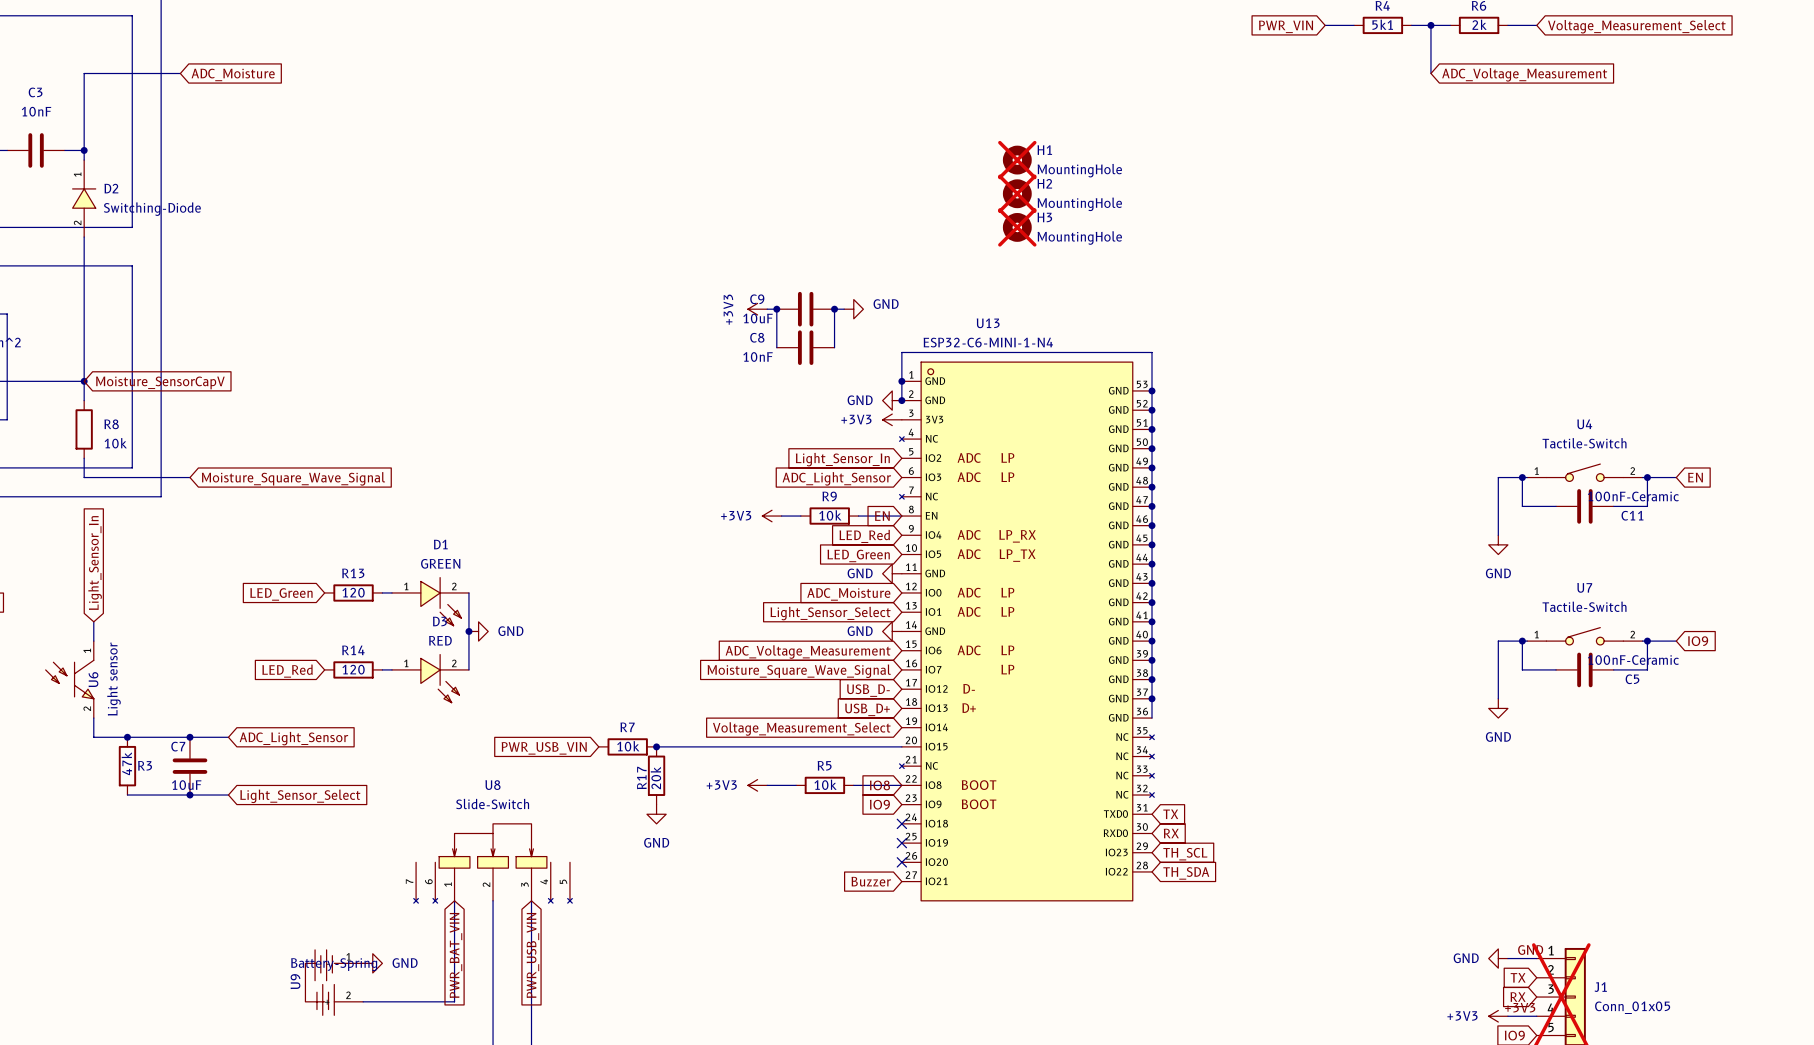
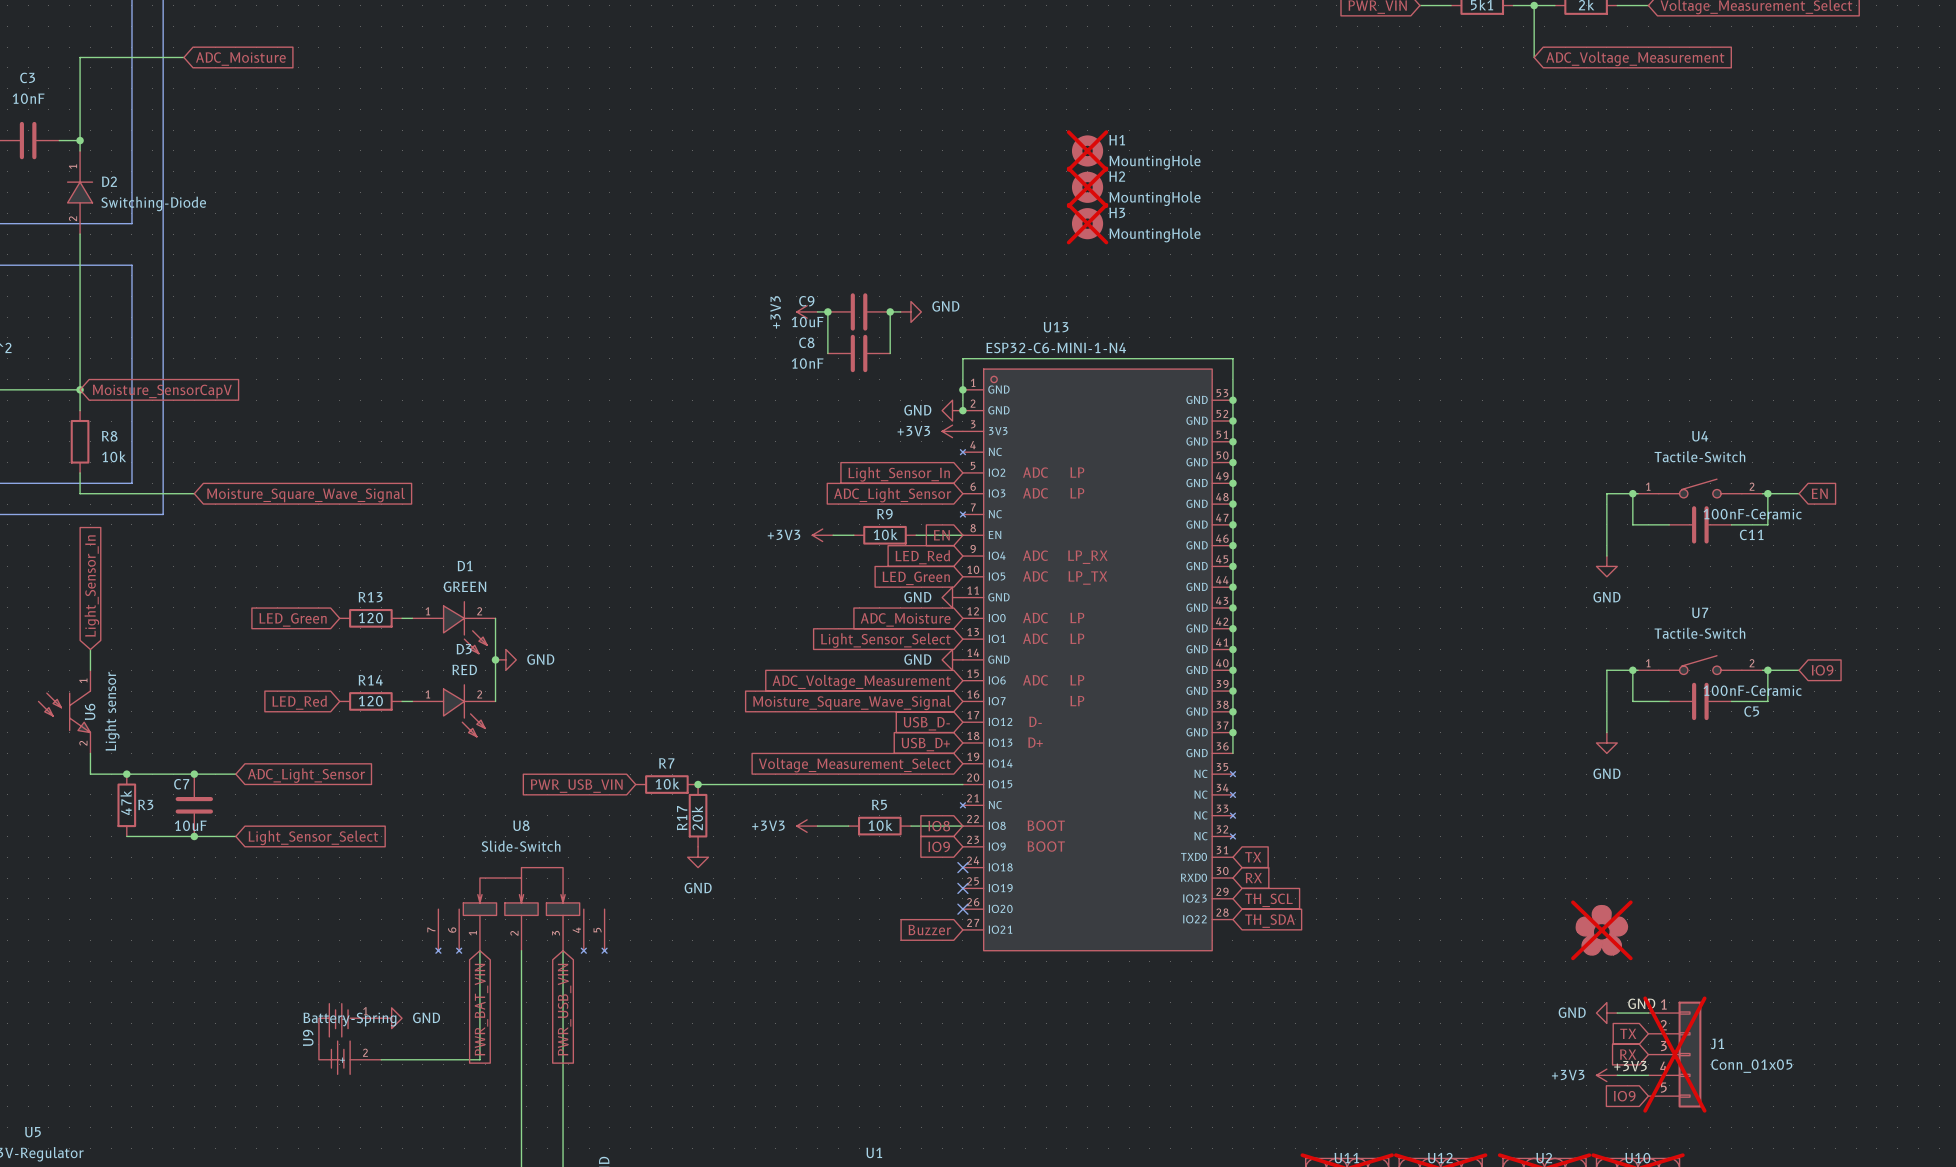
part: none -> (1601, 930)

